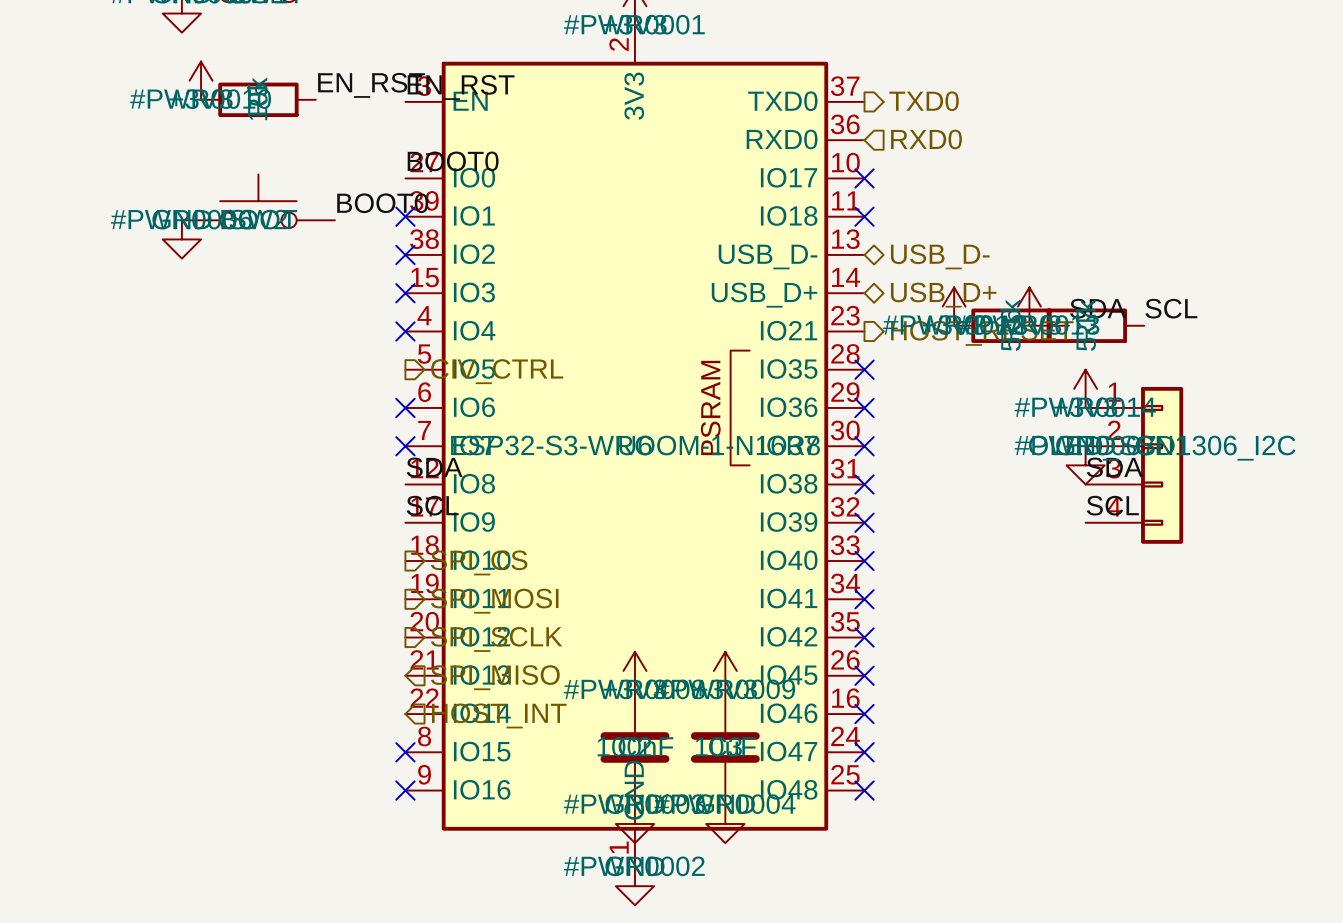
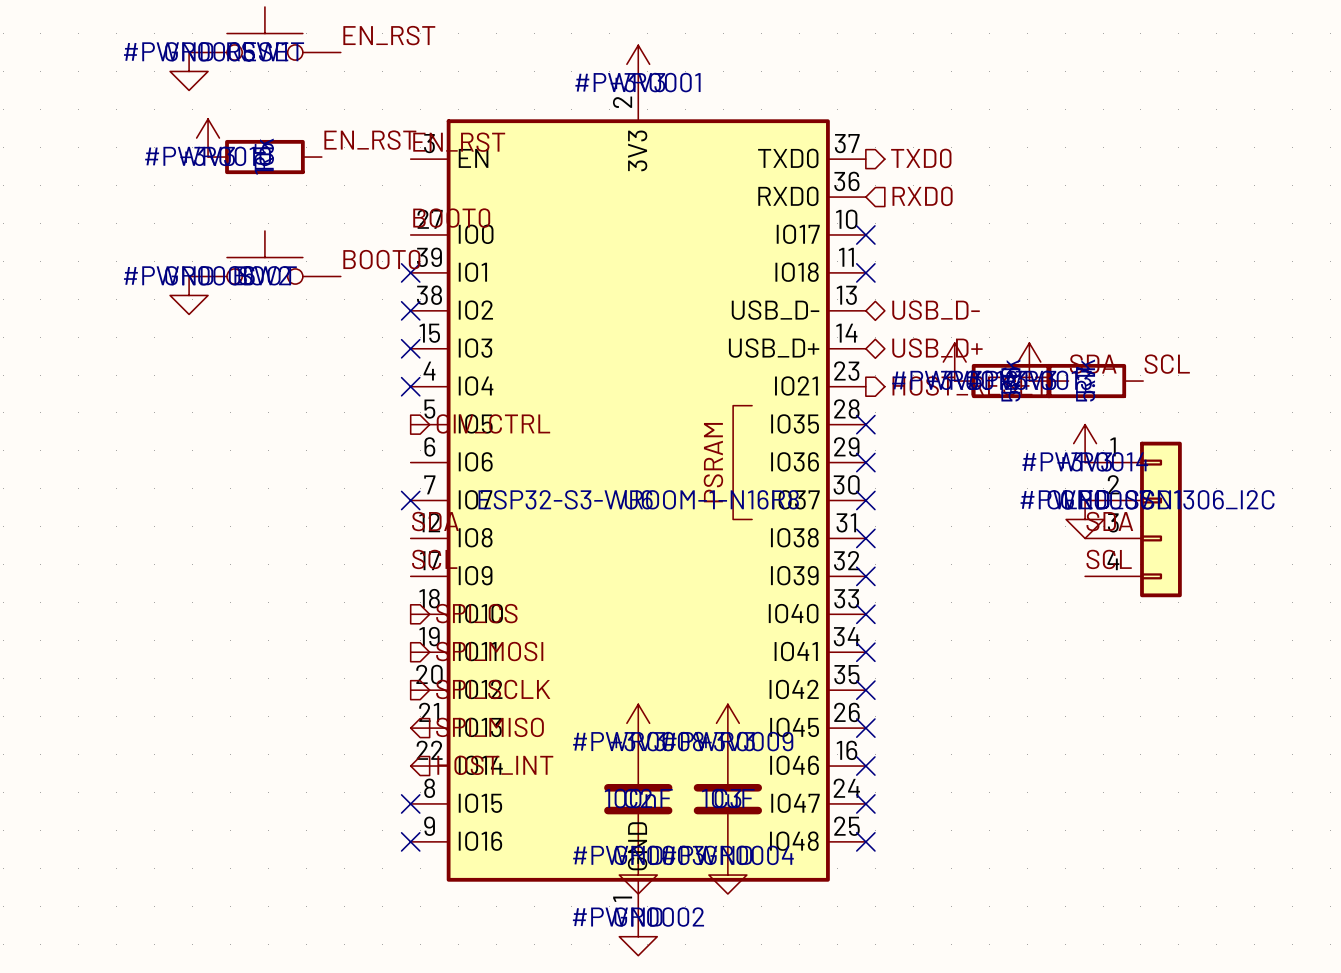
no-connect mark: (405, 407) -> none

